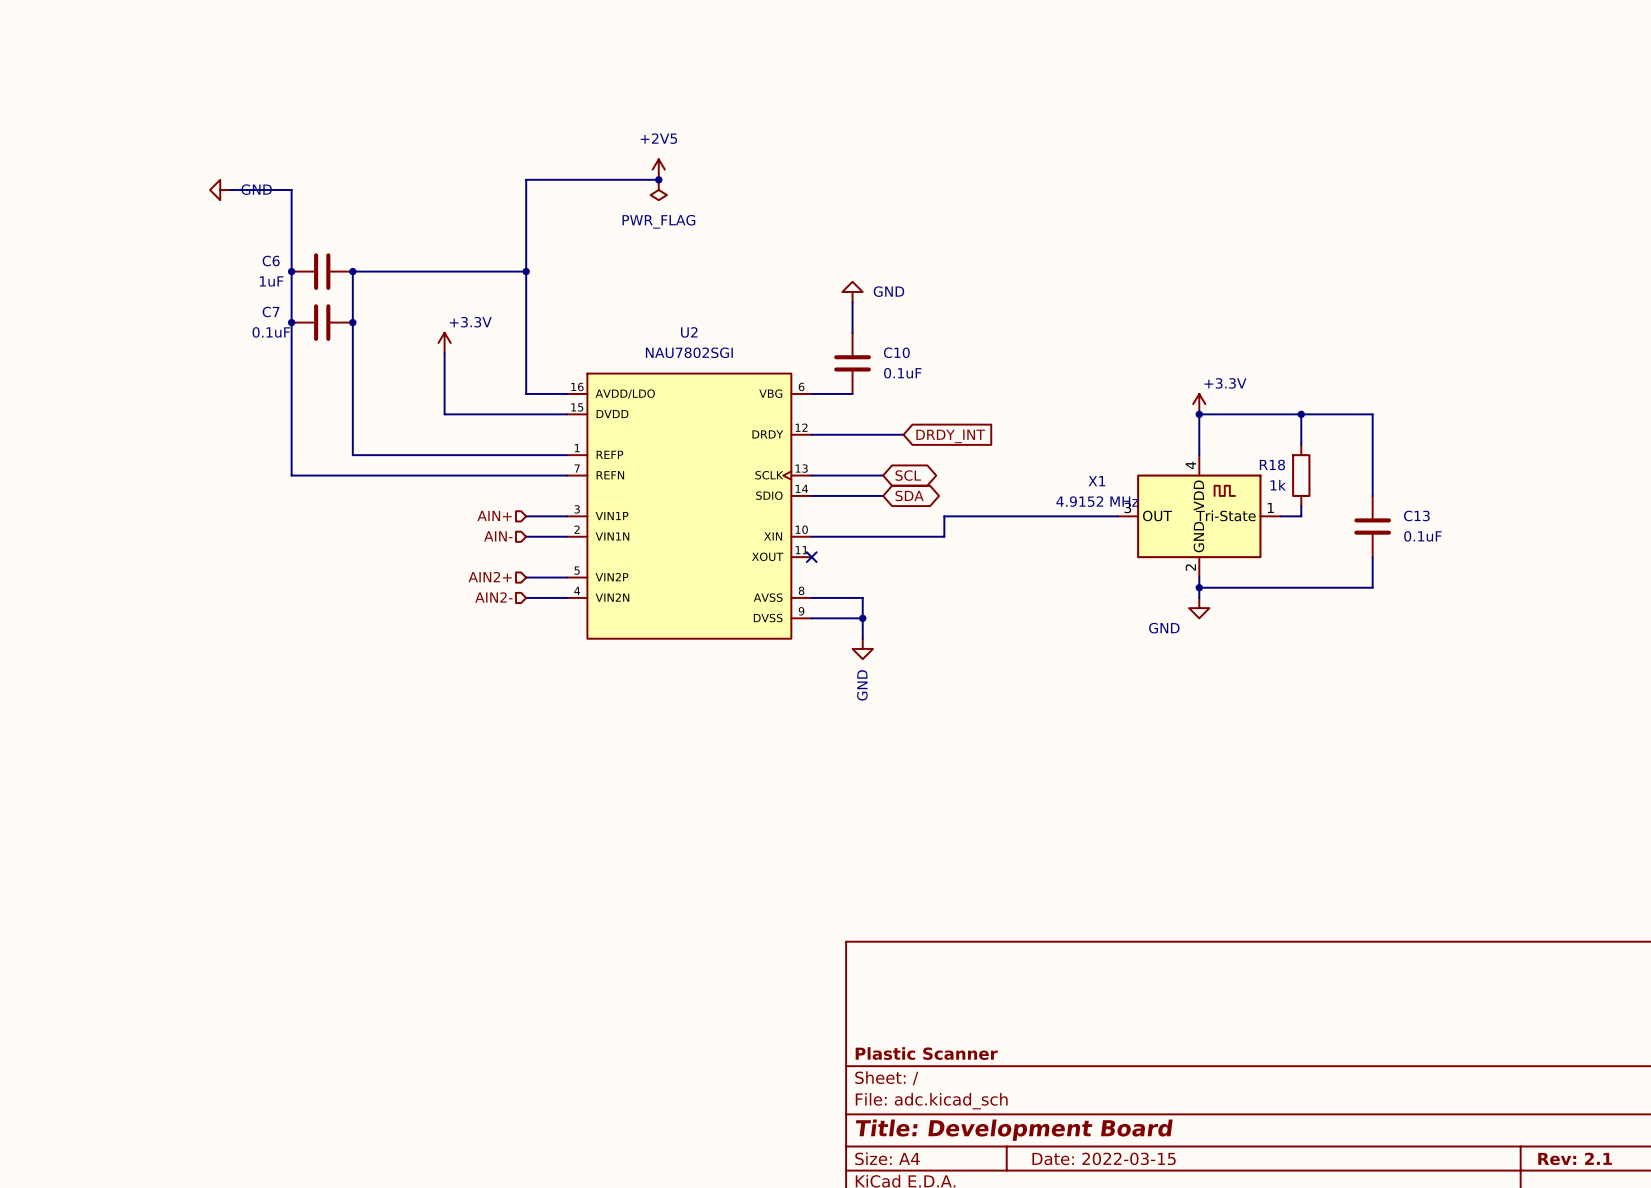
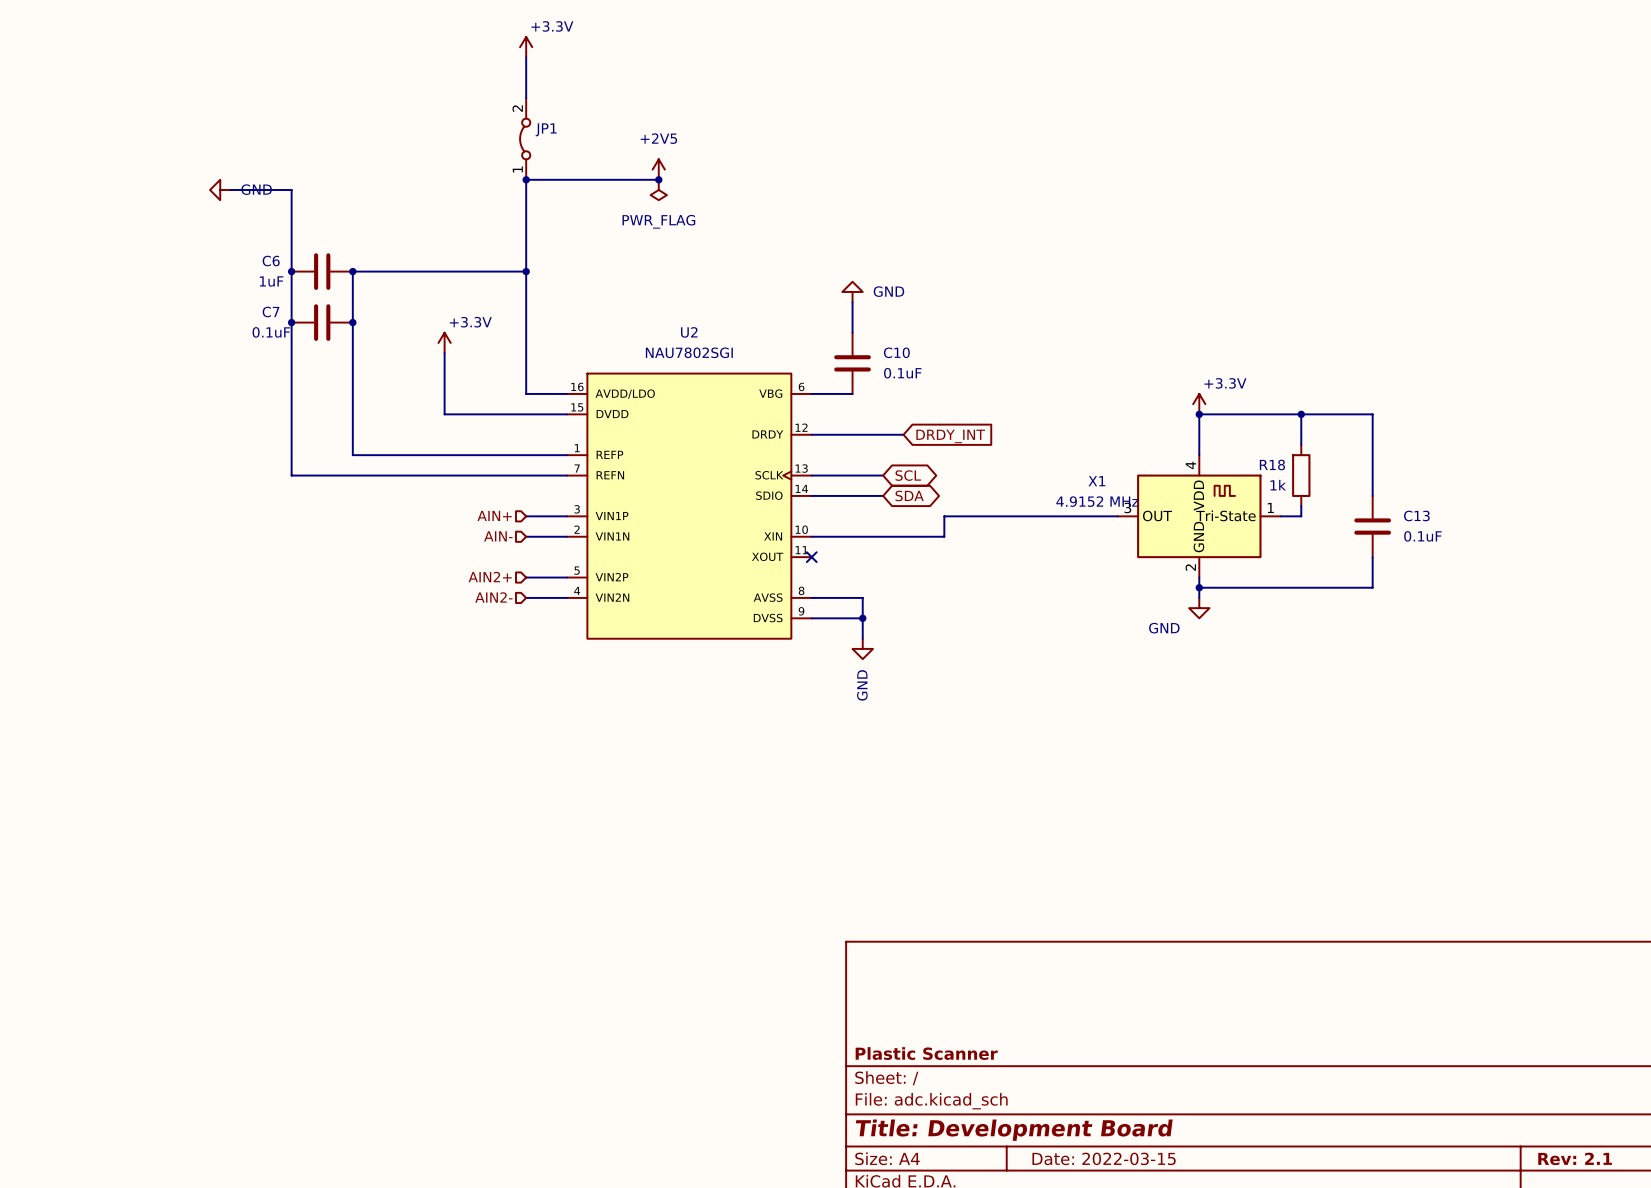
power symbol: none -> +3.3V (526, 47)
wire: none -> (526, 57) (526, 98)
JP1: none -> (525, 139)
junction: none -> (526, 179)

